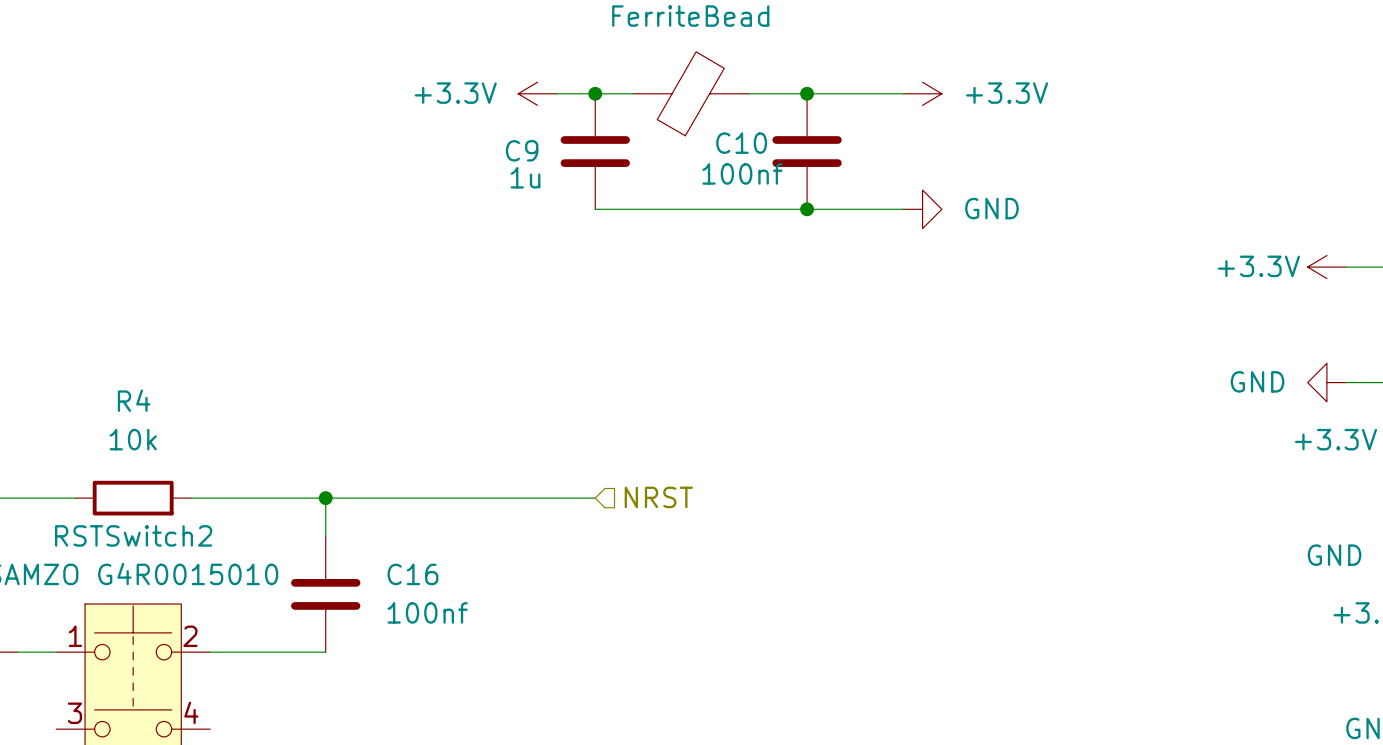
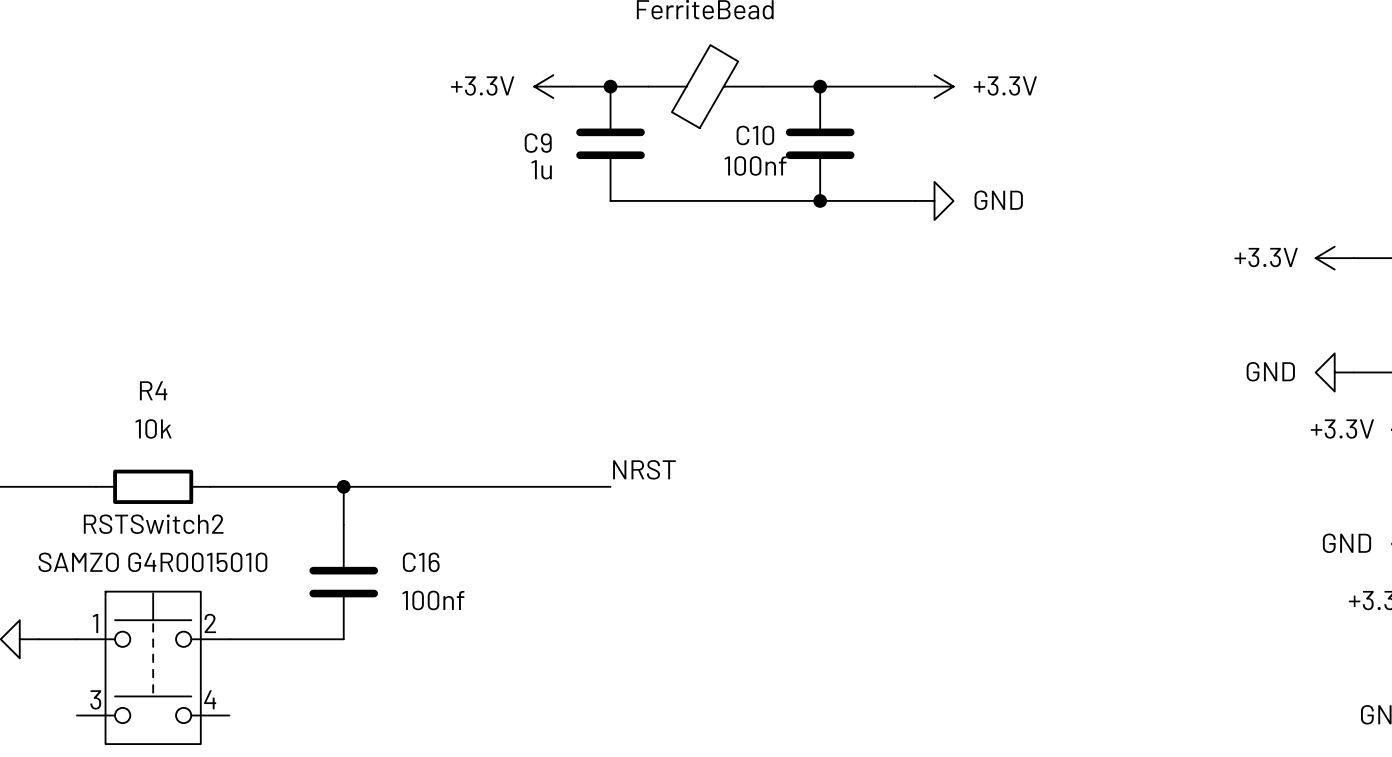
label: none -> NRST (644, 469)
hierarchical label: NRST (658, 497) -> none

